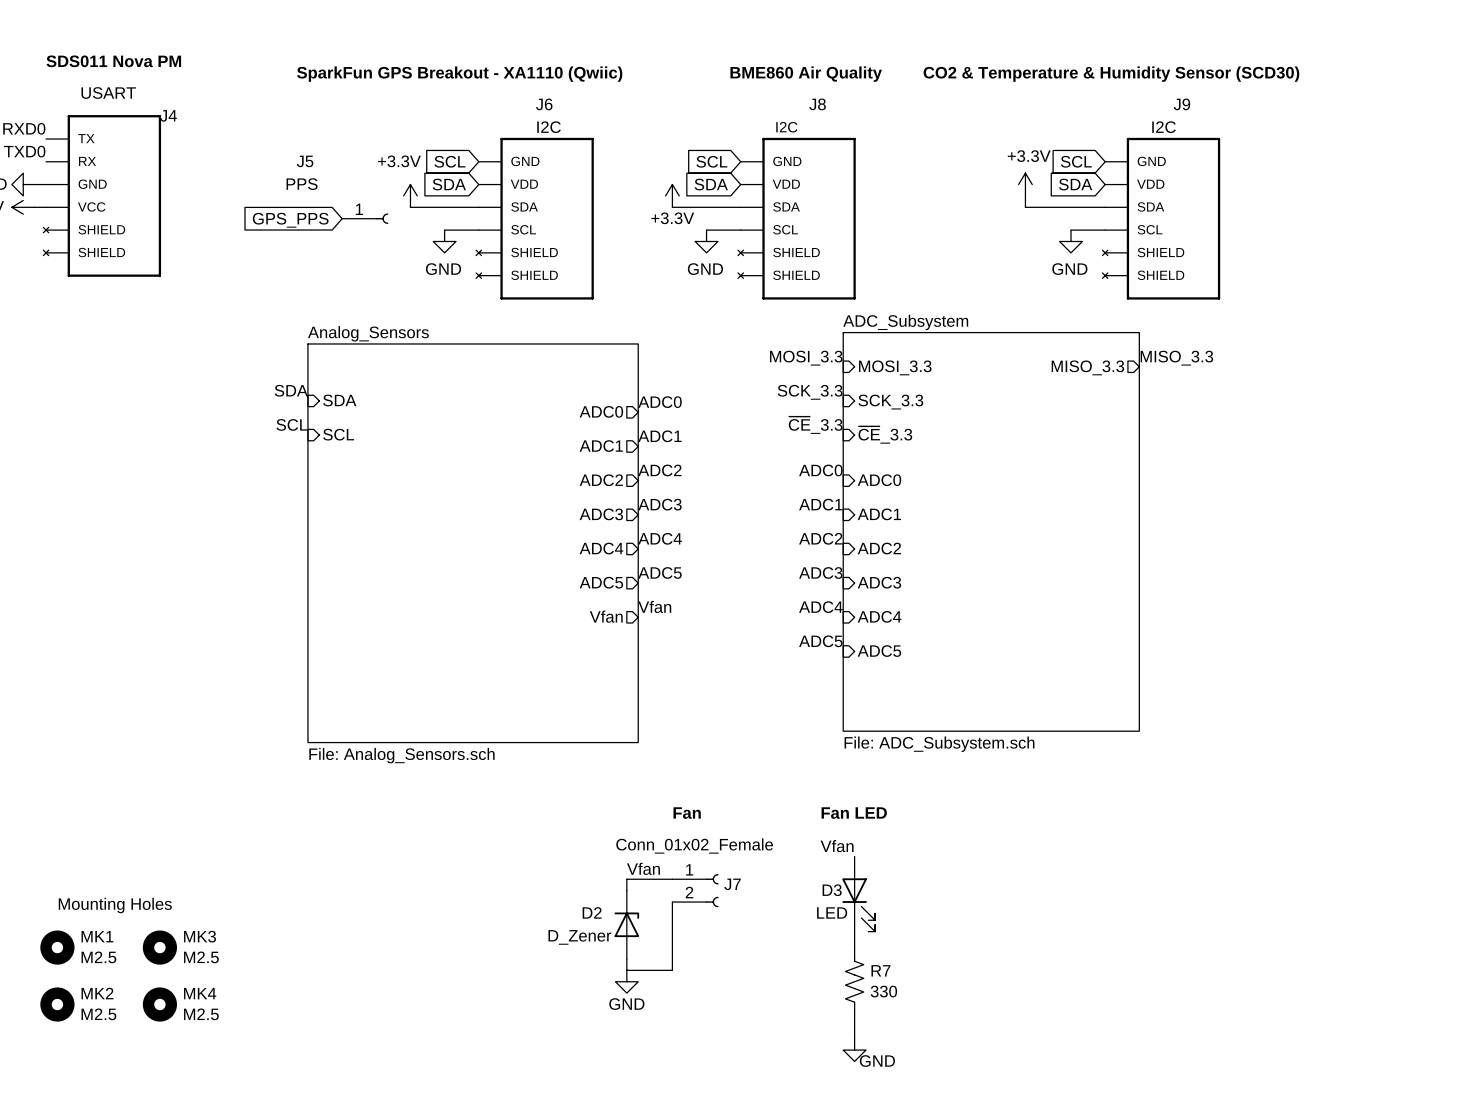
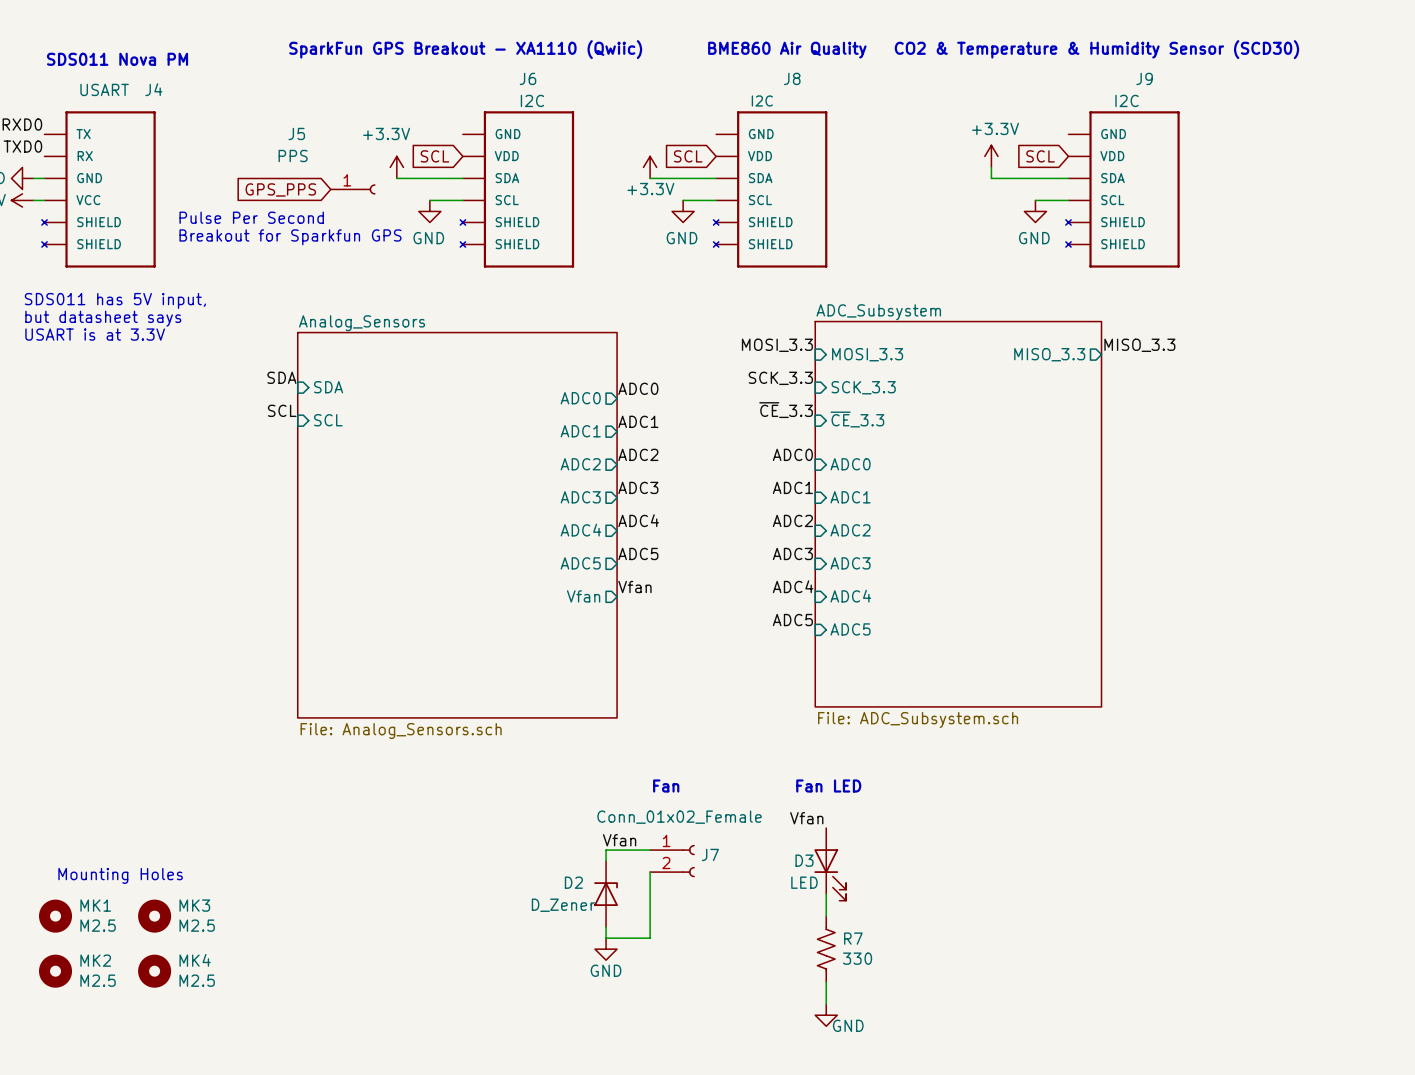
text position: SparkFun GPS Breakout - XA1110 (Qwiic) (459, 74) -> SparkFun GPS Breakout - XA1110 (Qwiic) (465, 49)
text position: BME860 Air Quality (806, 74) -> BME860 Air Quality (787, 50)
text position: CO2 & Temperature & Humidity Sensor (SCD30) (1111, 74) -> CO2 & Temperature & Humidity Sensor (SCD30) (1096, 49)
J4 name position: J4 (168, 115) -> J4 (153, 89)
wire: none -> (991, 167) (991, 178) (1068, 178)
wire: none -> (396, 178) (462, 178)
global label: SDA (449, 184) -> none
wire: none -> (650, 178) (716, 178)
global label: SDA (711, 184) -> none
power symbol position: +3.3V (1025, 184) -> +3.3V (991, 156)
global label: SDA (1075, 184) -> none
power symbol position: +3.3V (410, 195) -> +3.3V (396, 167)
power symbol position: +3.3V (672, 195) -> +3.3V (650, 167)
wire: (1025, 195) (1025, 207) (1070, 207) -> none
wire: (410, 207) (444, 207) -> none
wire: (672, 207) (706, 207) -> none
J5 position: (365, 218) -> (353, 189)
J6 position: (534, 218) -> (517, 189)
J8 position: (796, 218) -> (770, 189)
J9 position: (1161, 218) -> (1122, 189)
global label position: GPS_PPS (290, 220) -> GPS_PPS (280, 189)
text: none -> Pulse Per Second (251, 217)
wire: (444, 230) (478, 230) -> none
wire: (706, 230) (740, 230) -> none
wire: (1070, 230) (1105, 230) -> none
power symbol position: GND (444, 241) -> GND (429, 211)
power symbol position: GND (706, 241) -> GND (683, 211)
power symbol position: GND (1070, 241) -> GND (1035, 211)
text: none -> Breakout for Sparkfun GPS (290, 237)
text: none -> SDS011 has 5V input, (115, 300)
text: none -> but datasheet says (103, 318)
text: none -> USART is at 3.3V (95, 334)

